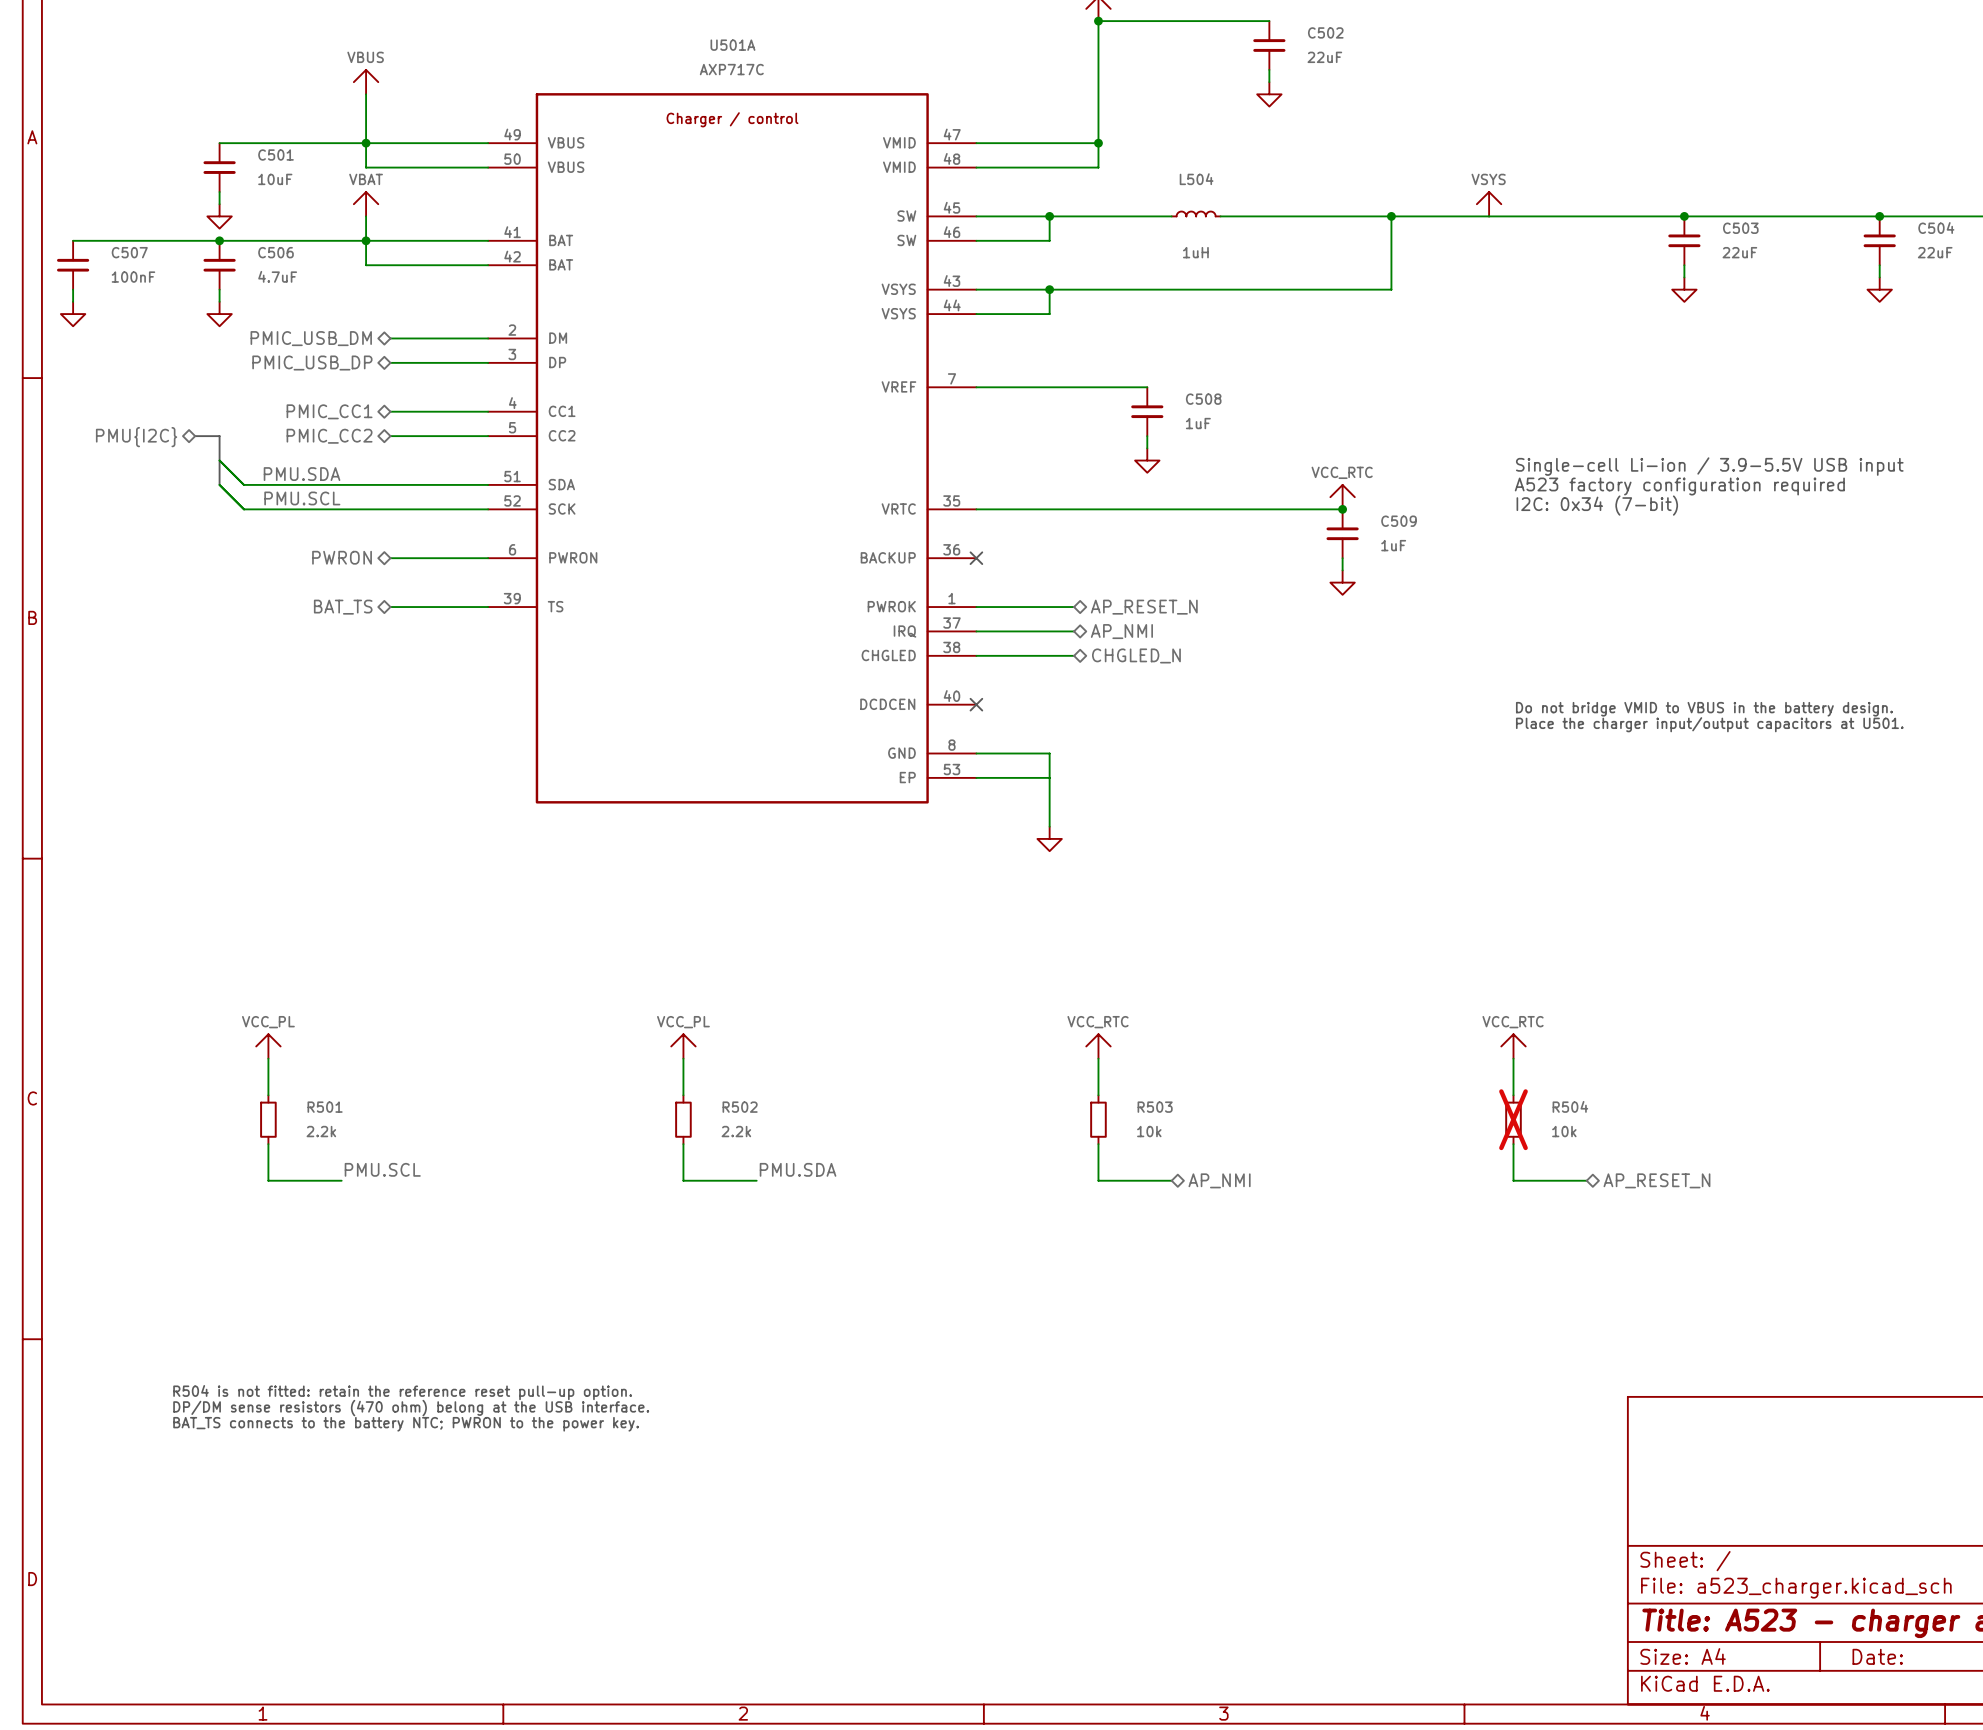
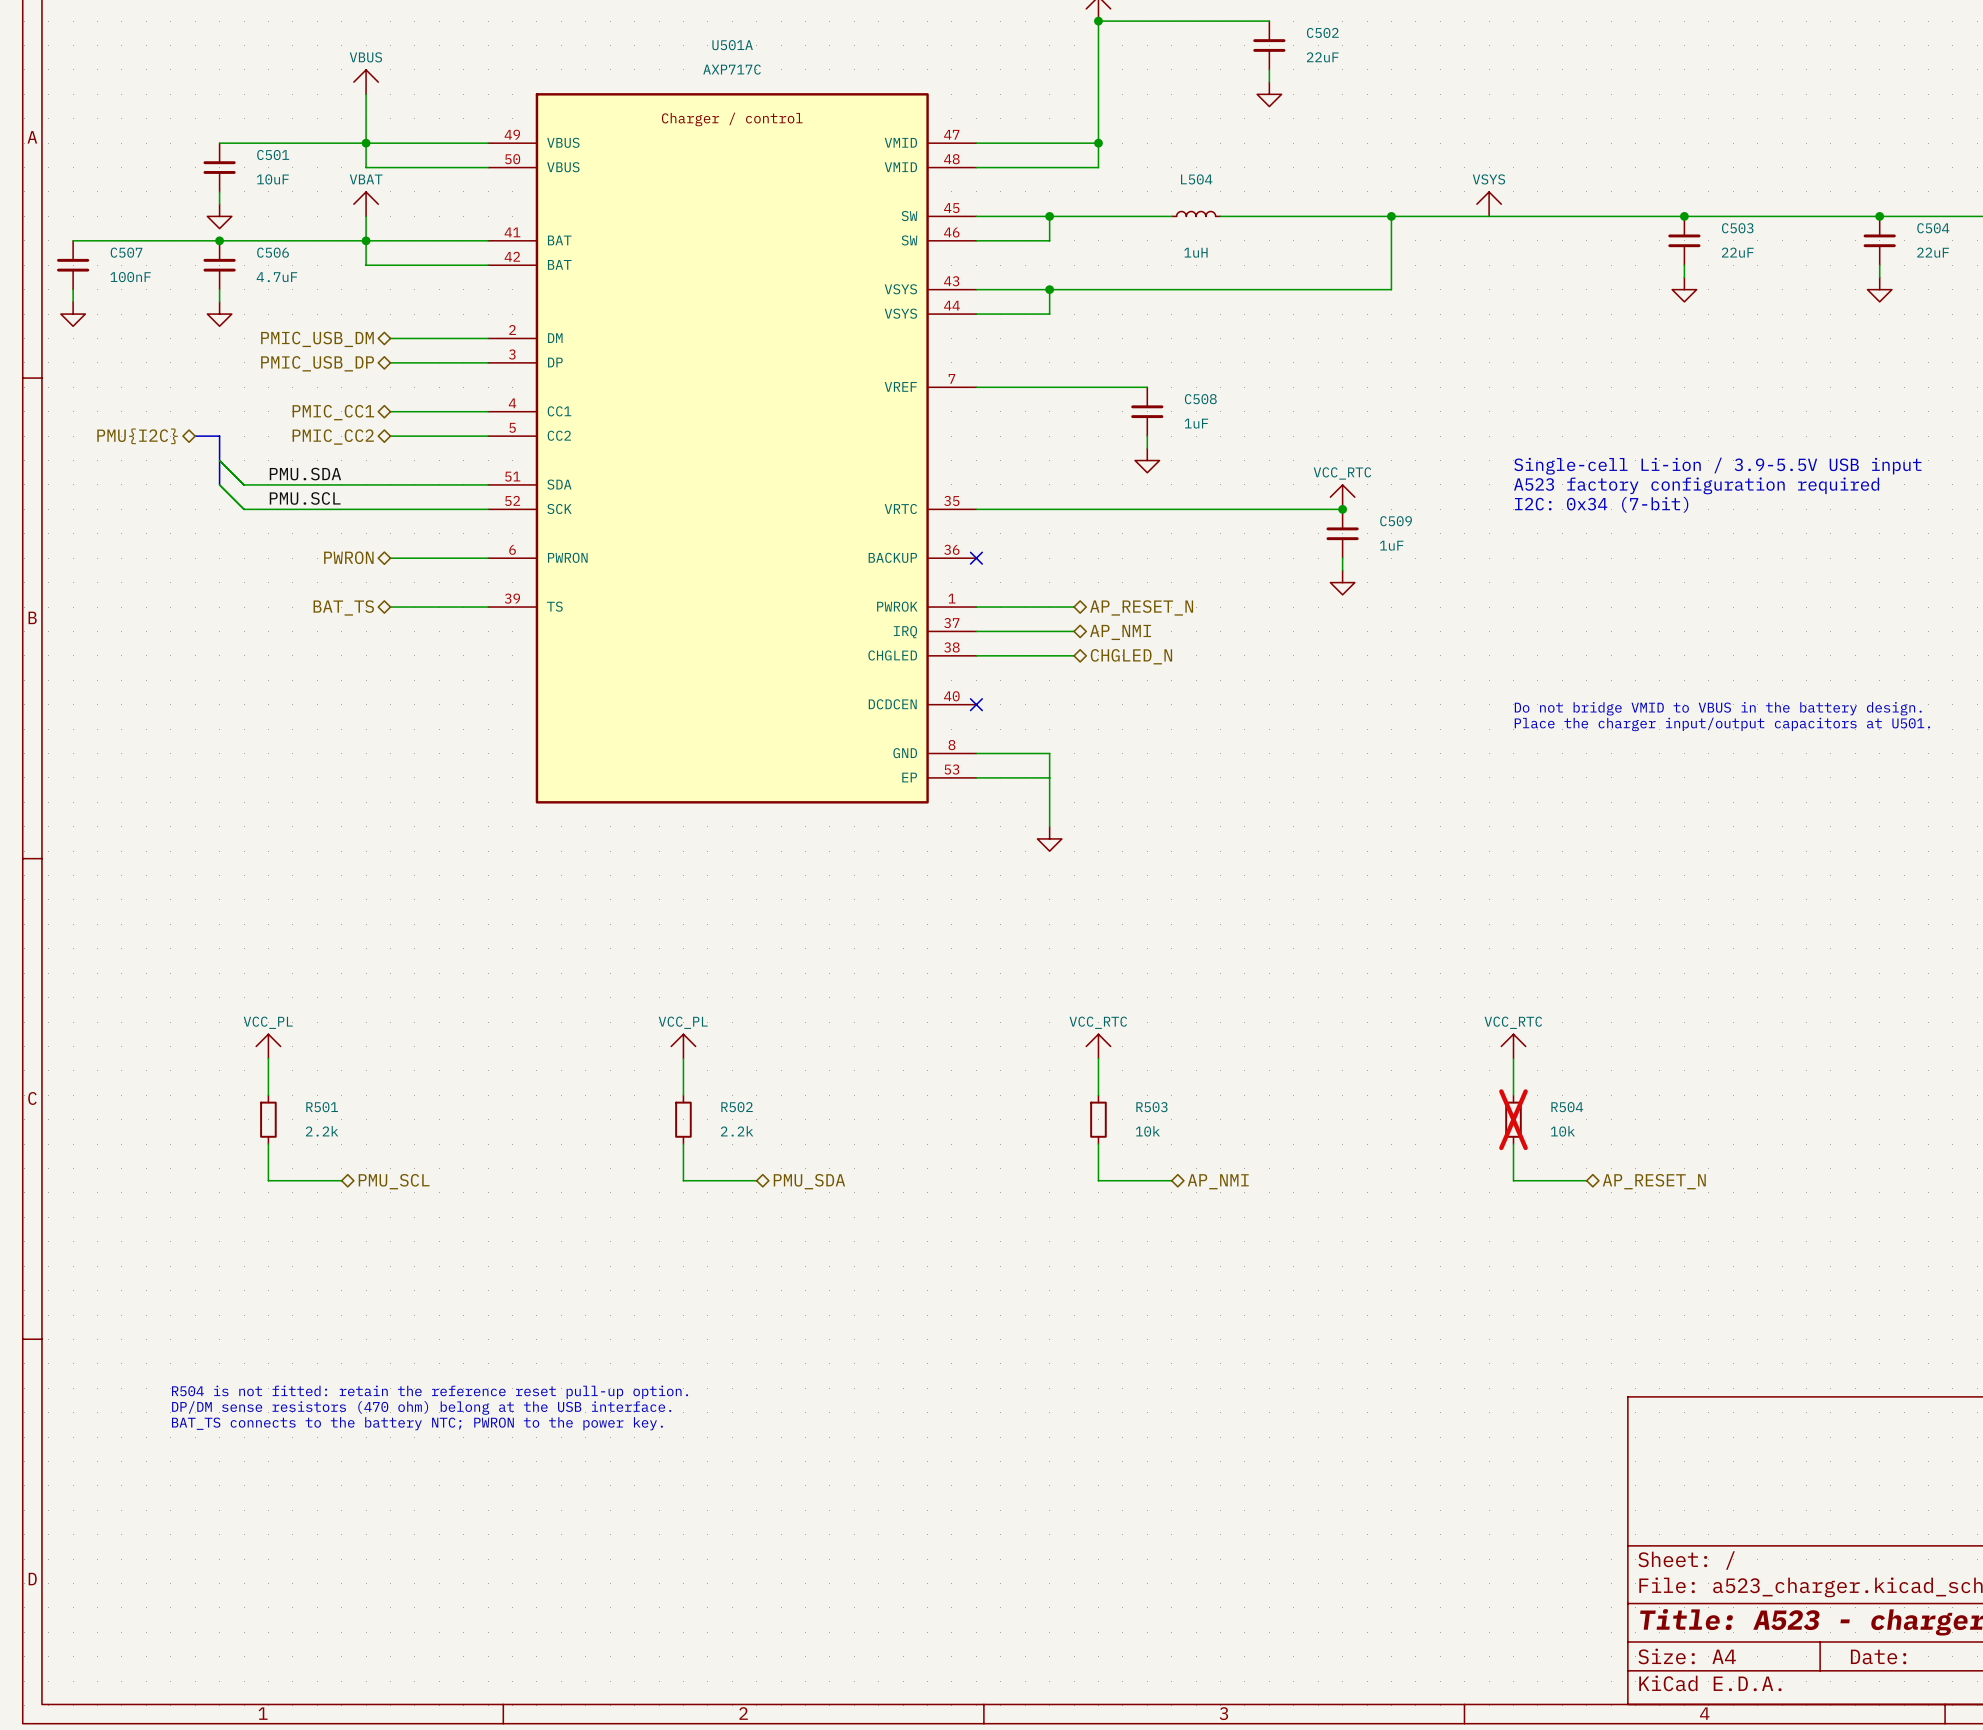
label: PMU.SCL (382, 1169) -> none
label: PMU.SDA (798, 1169) -> none
hierarchical label: none -> PMU_SCL (394, 1181)
hierarchical label: none -> PMU_SDA (809, 1181)

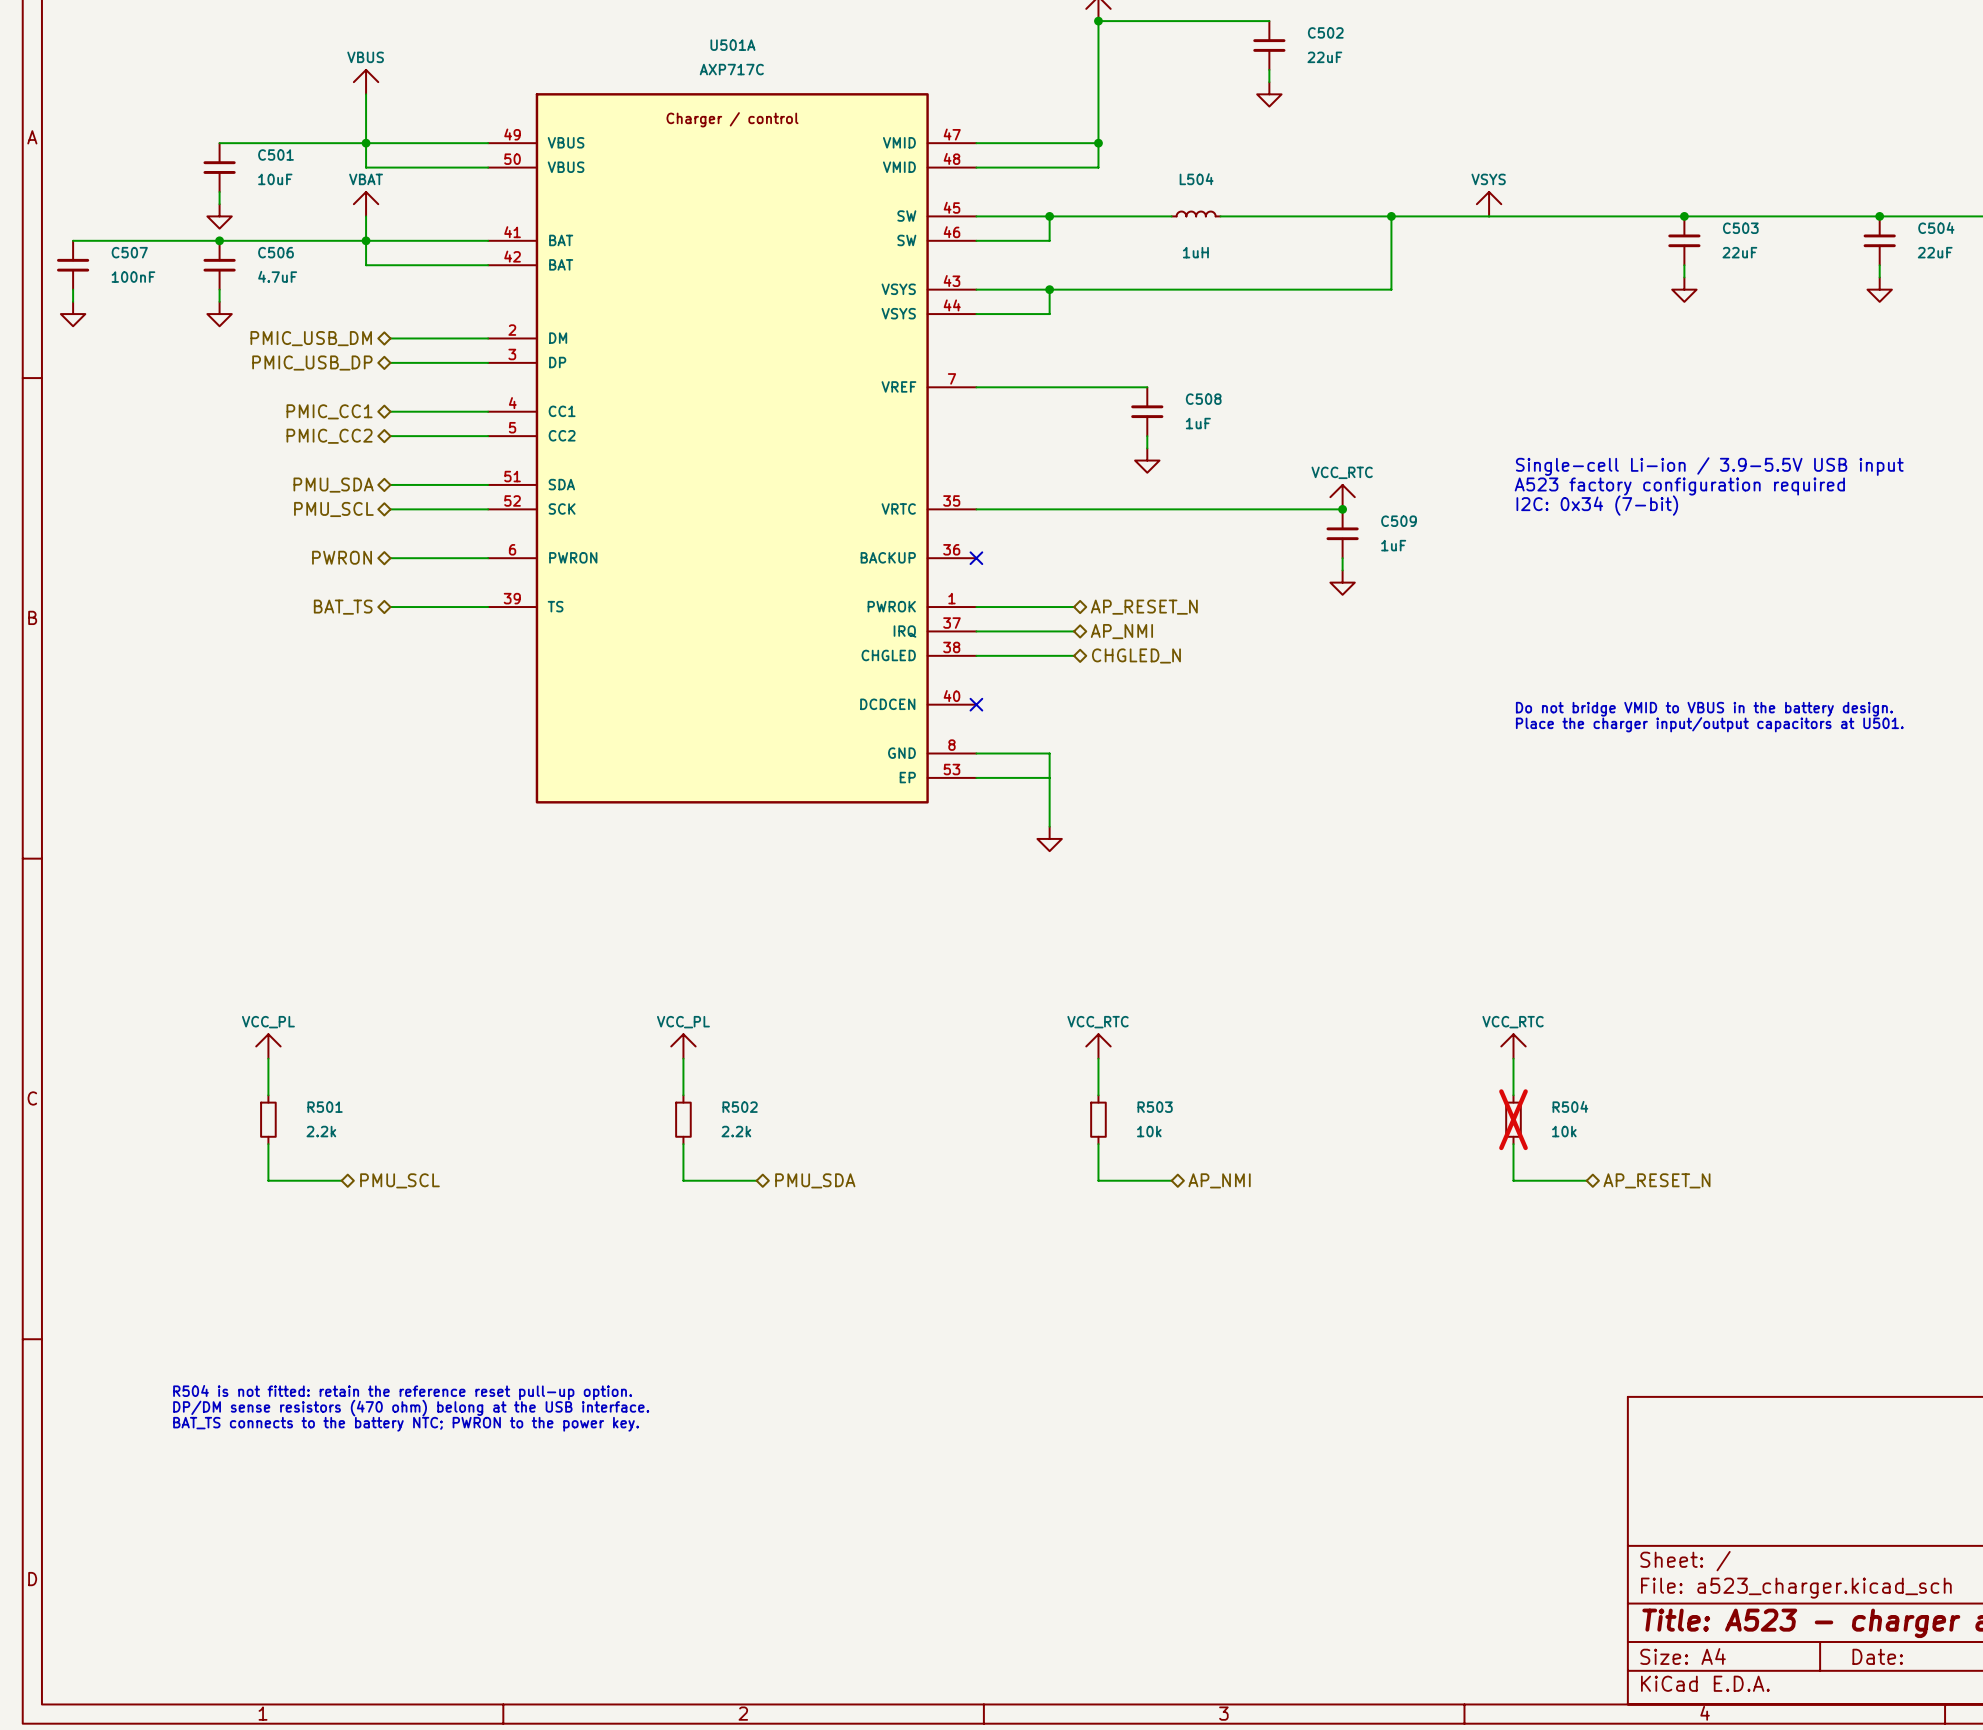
hierarchical label: PMU{I2C} (137, 436) -> none
bus: (195, 436) (219, 436) (219, 484) -> none
wire: (219, 460) (244, 484) (390, 484) -> none
label: PMU.SDA (305, 474) -> none
wire: (219, 484) (244, 509) (390, 509) -> none
hierarchical label: none -> PMU_SDA (333, 485)
label: PMU.SCL (305, 498) -> none
hierarchical label: none -> PMU_SCL (333, 509)

